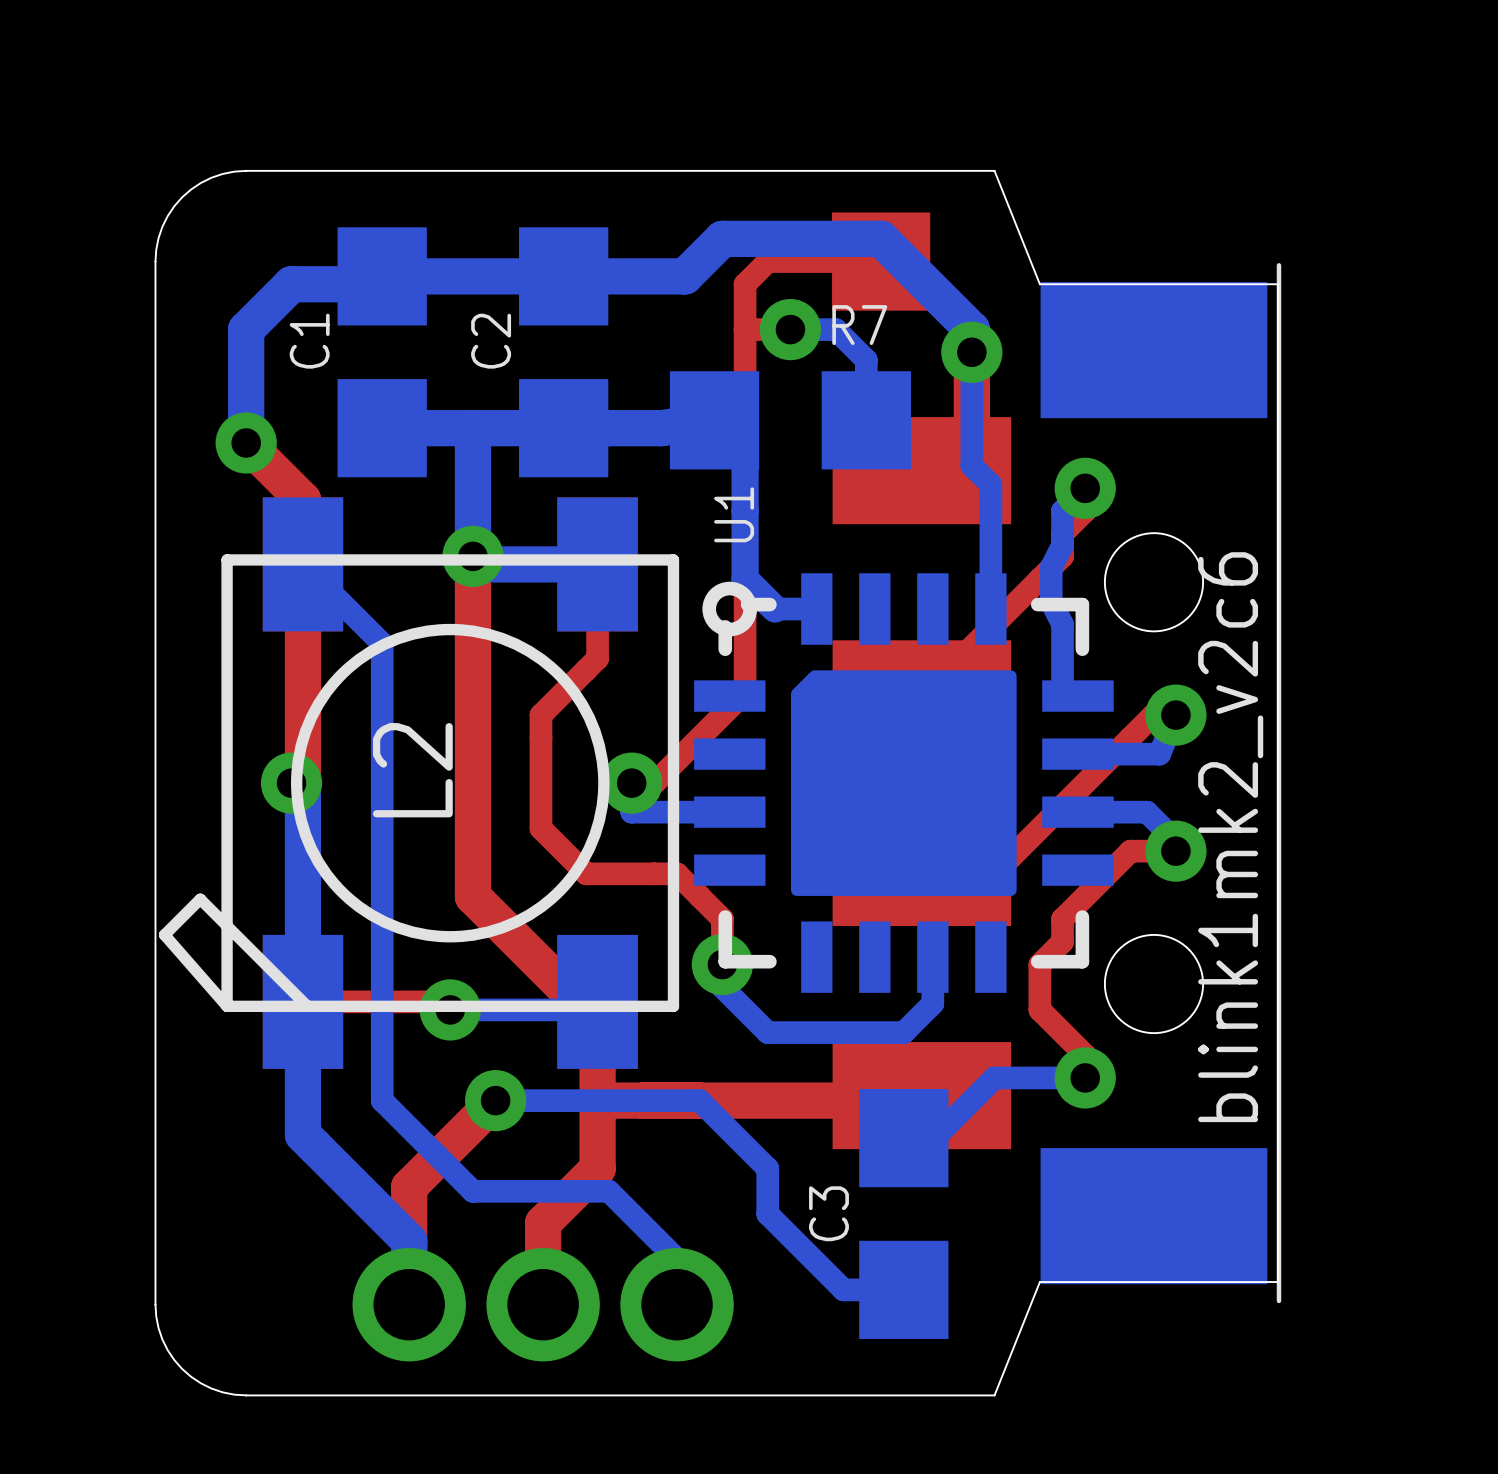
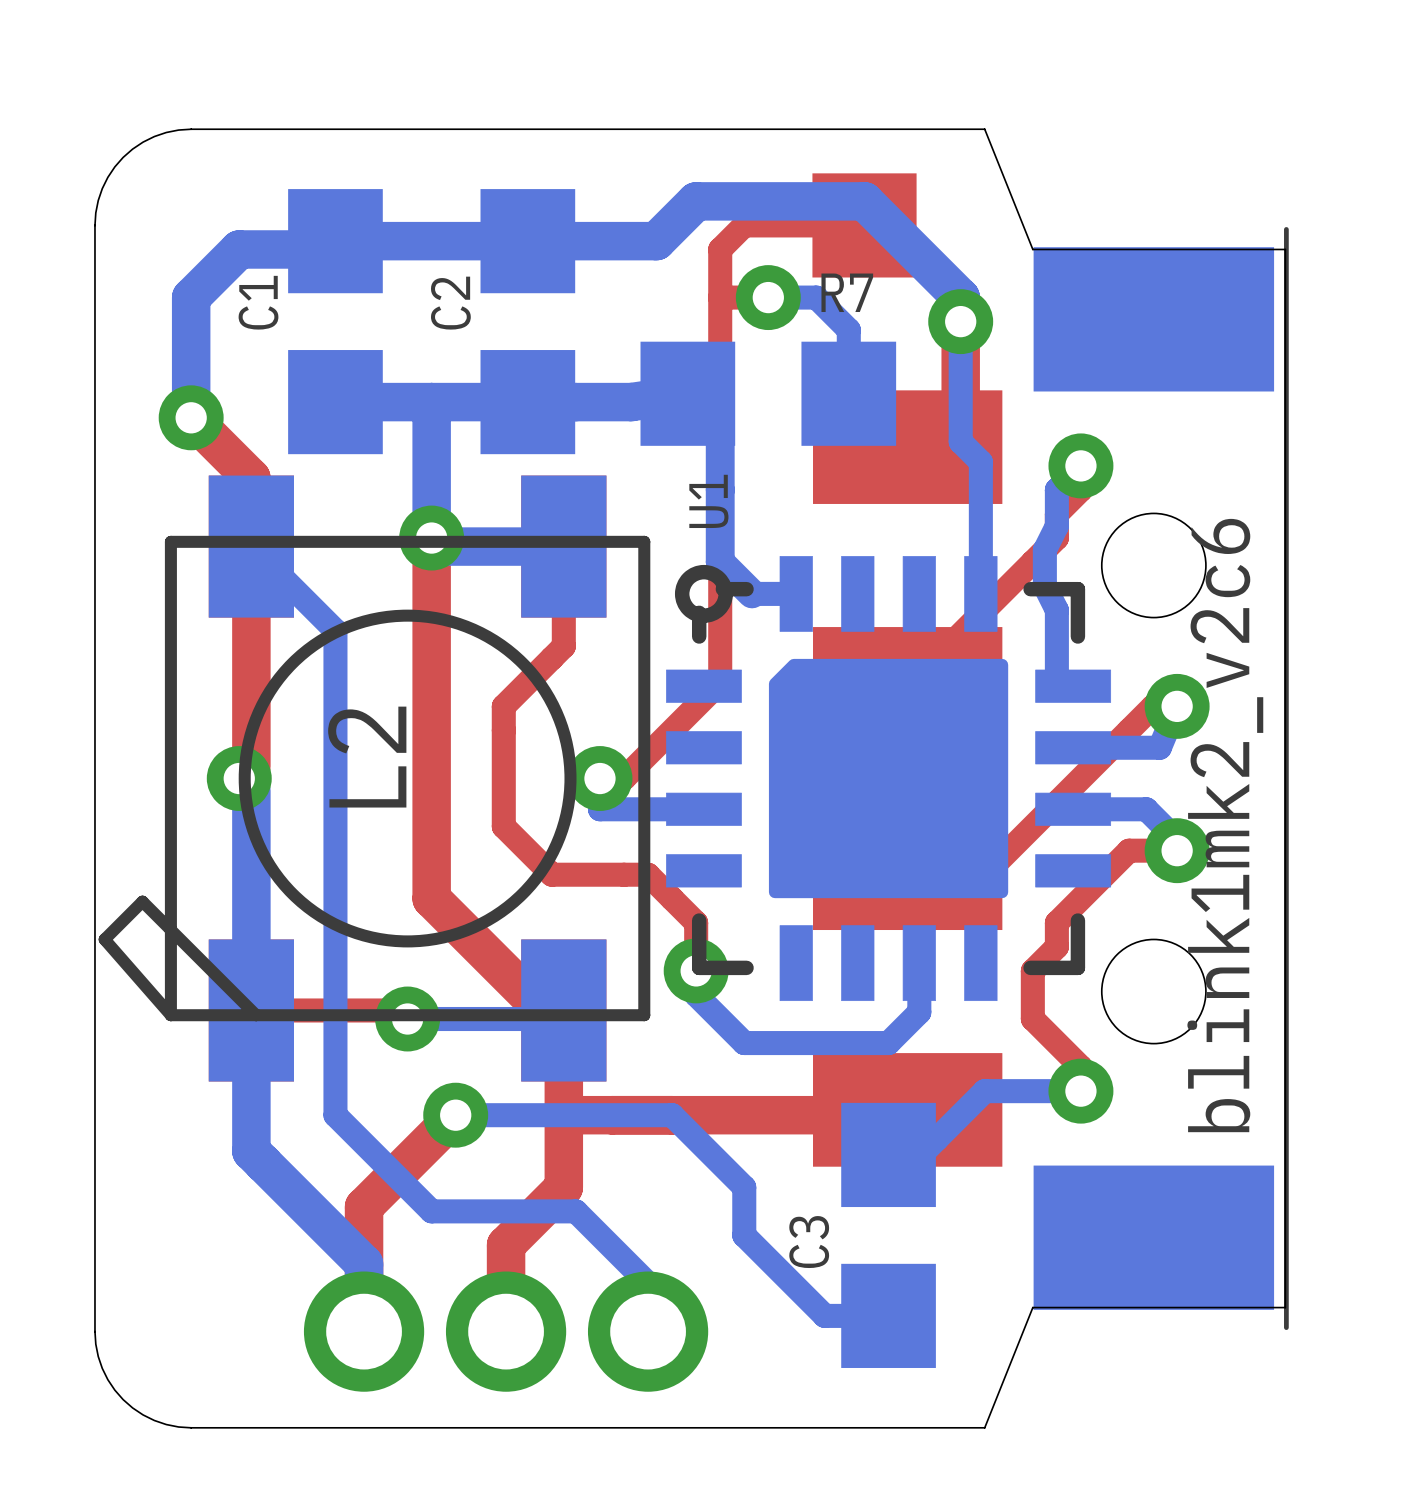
text position: blink1mk2_v2c6 (1230, 837) -> blink1mk2_v2c6 (1225, 825)

